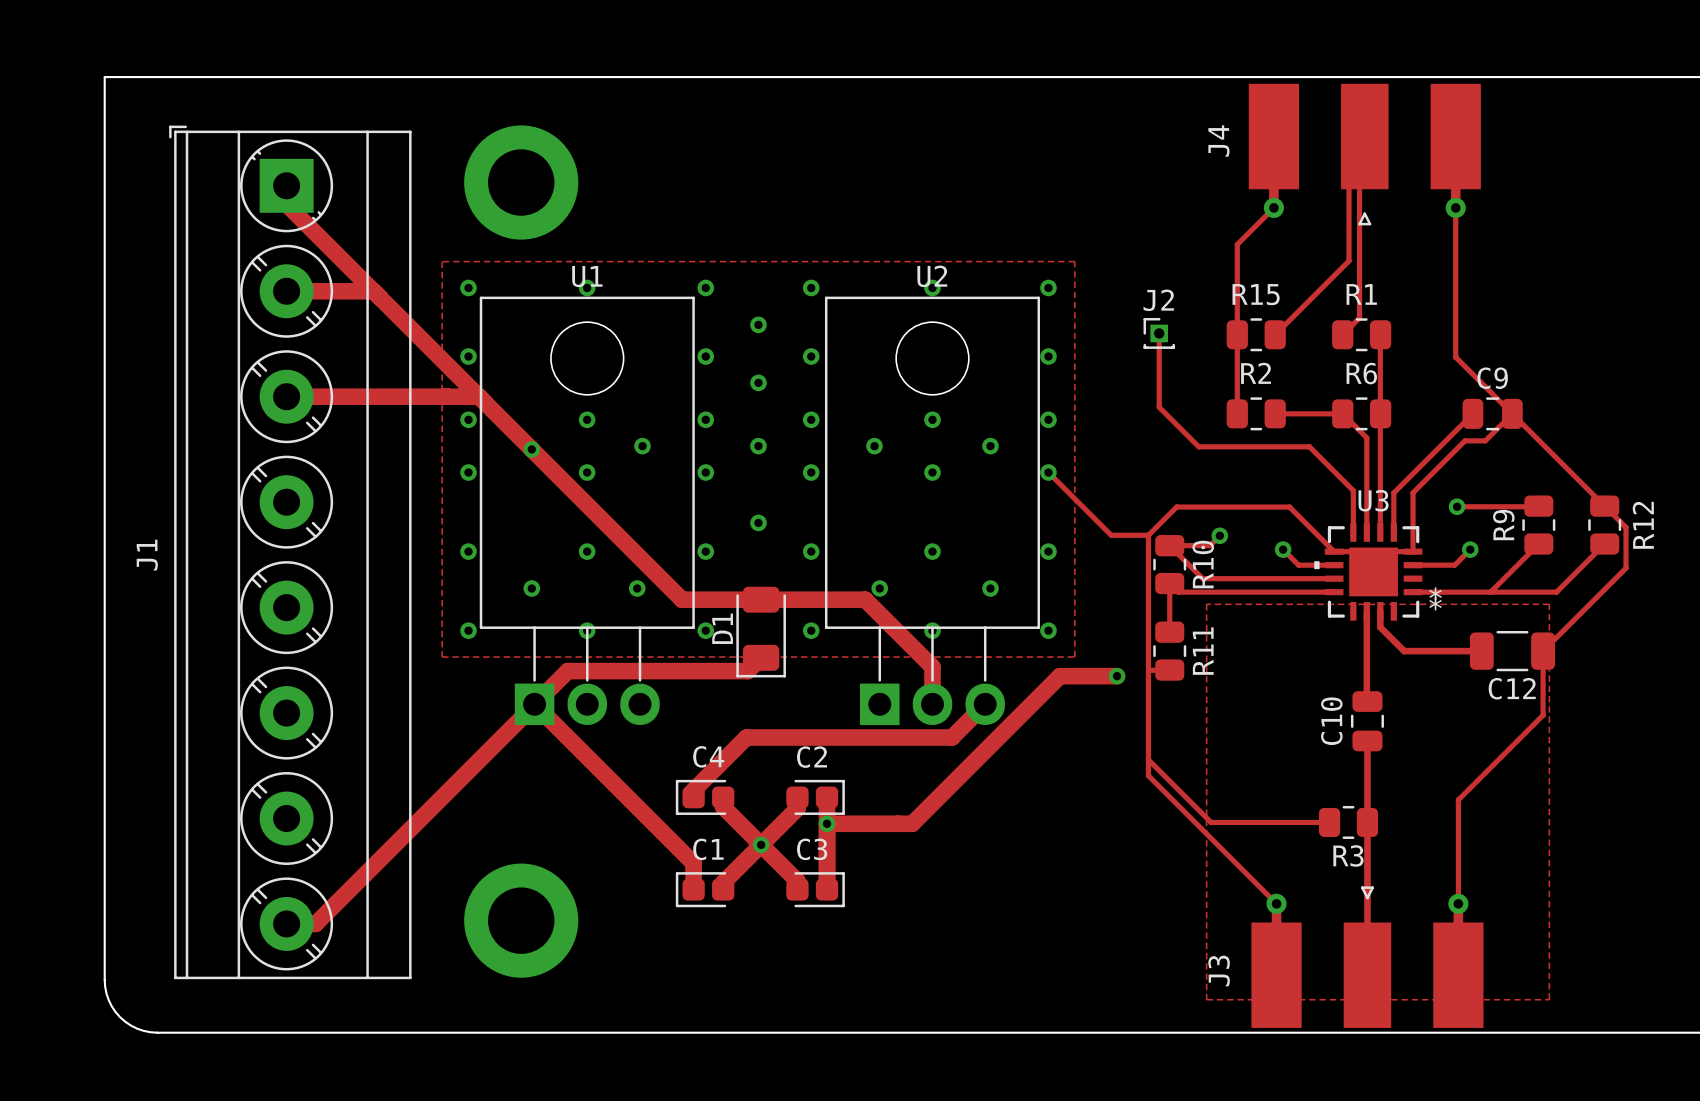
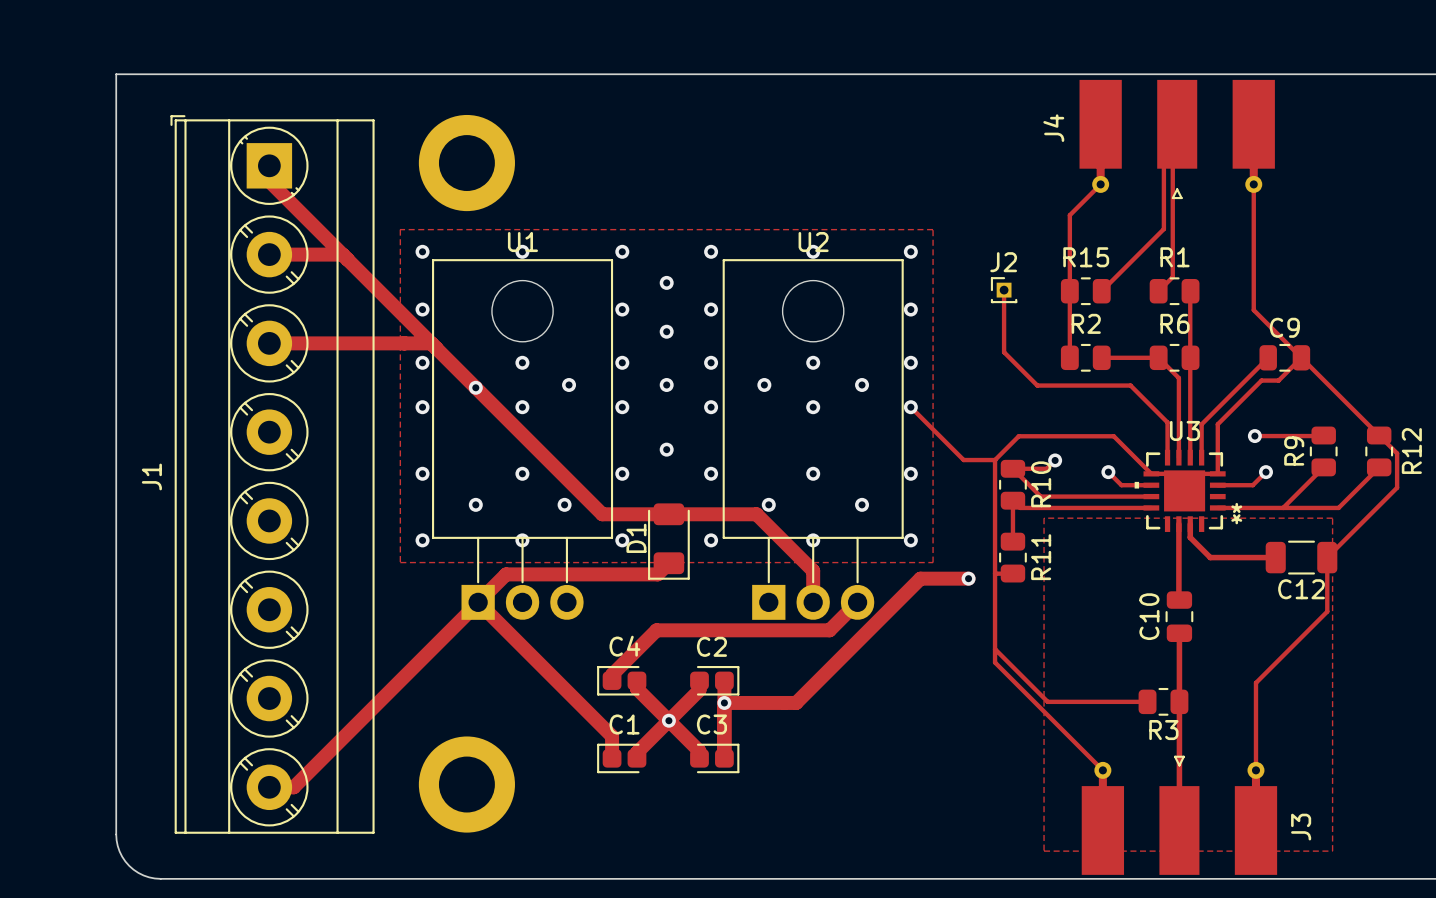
J3 name position: J3 (1219, 970) -> J3 (1301, 827)

